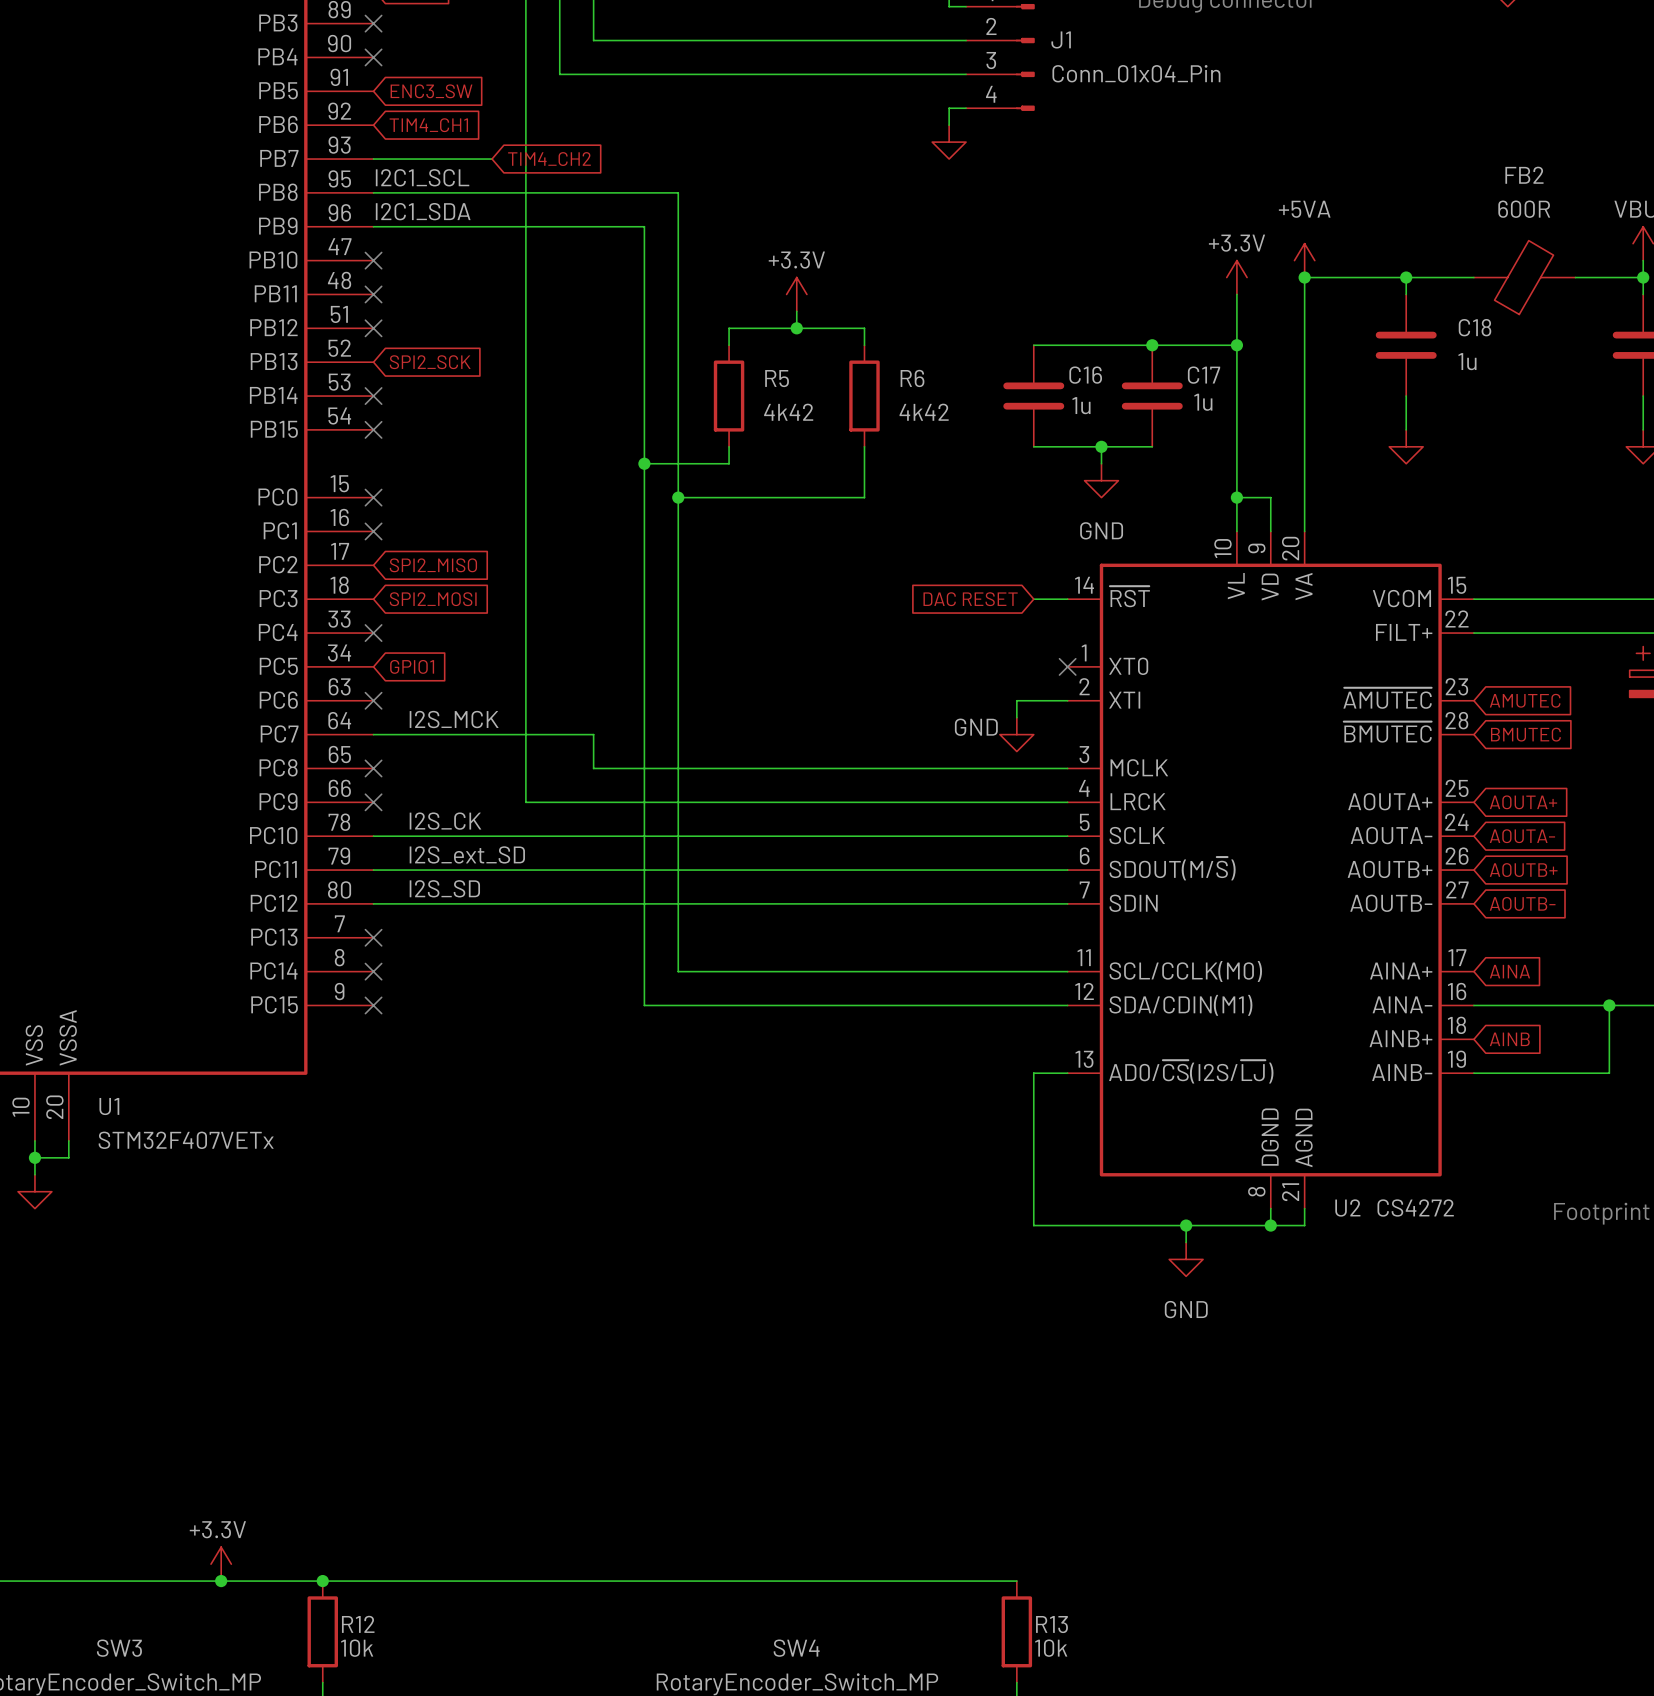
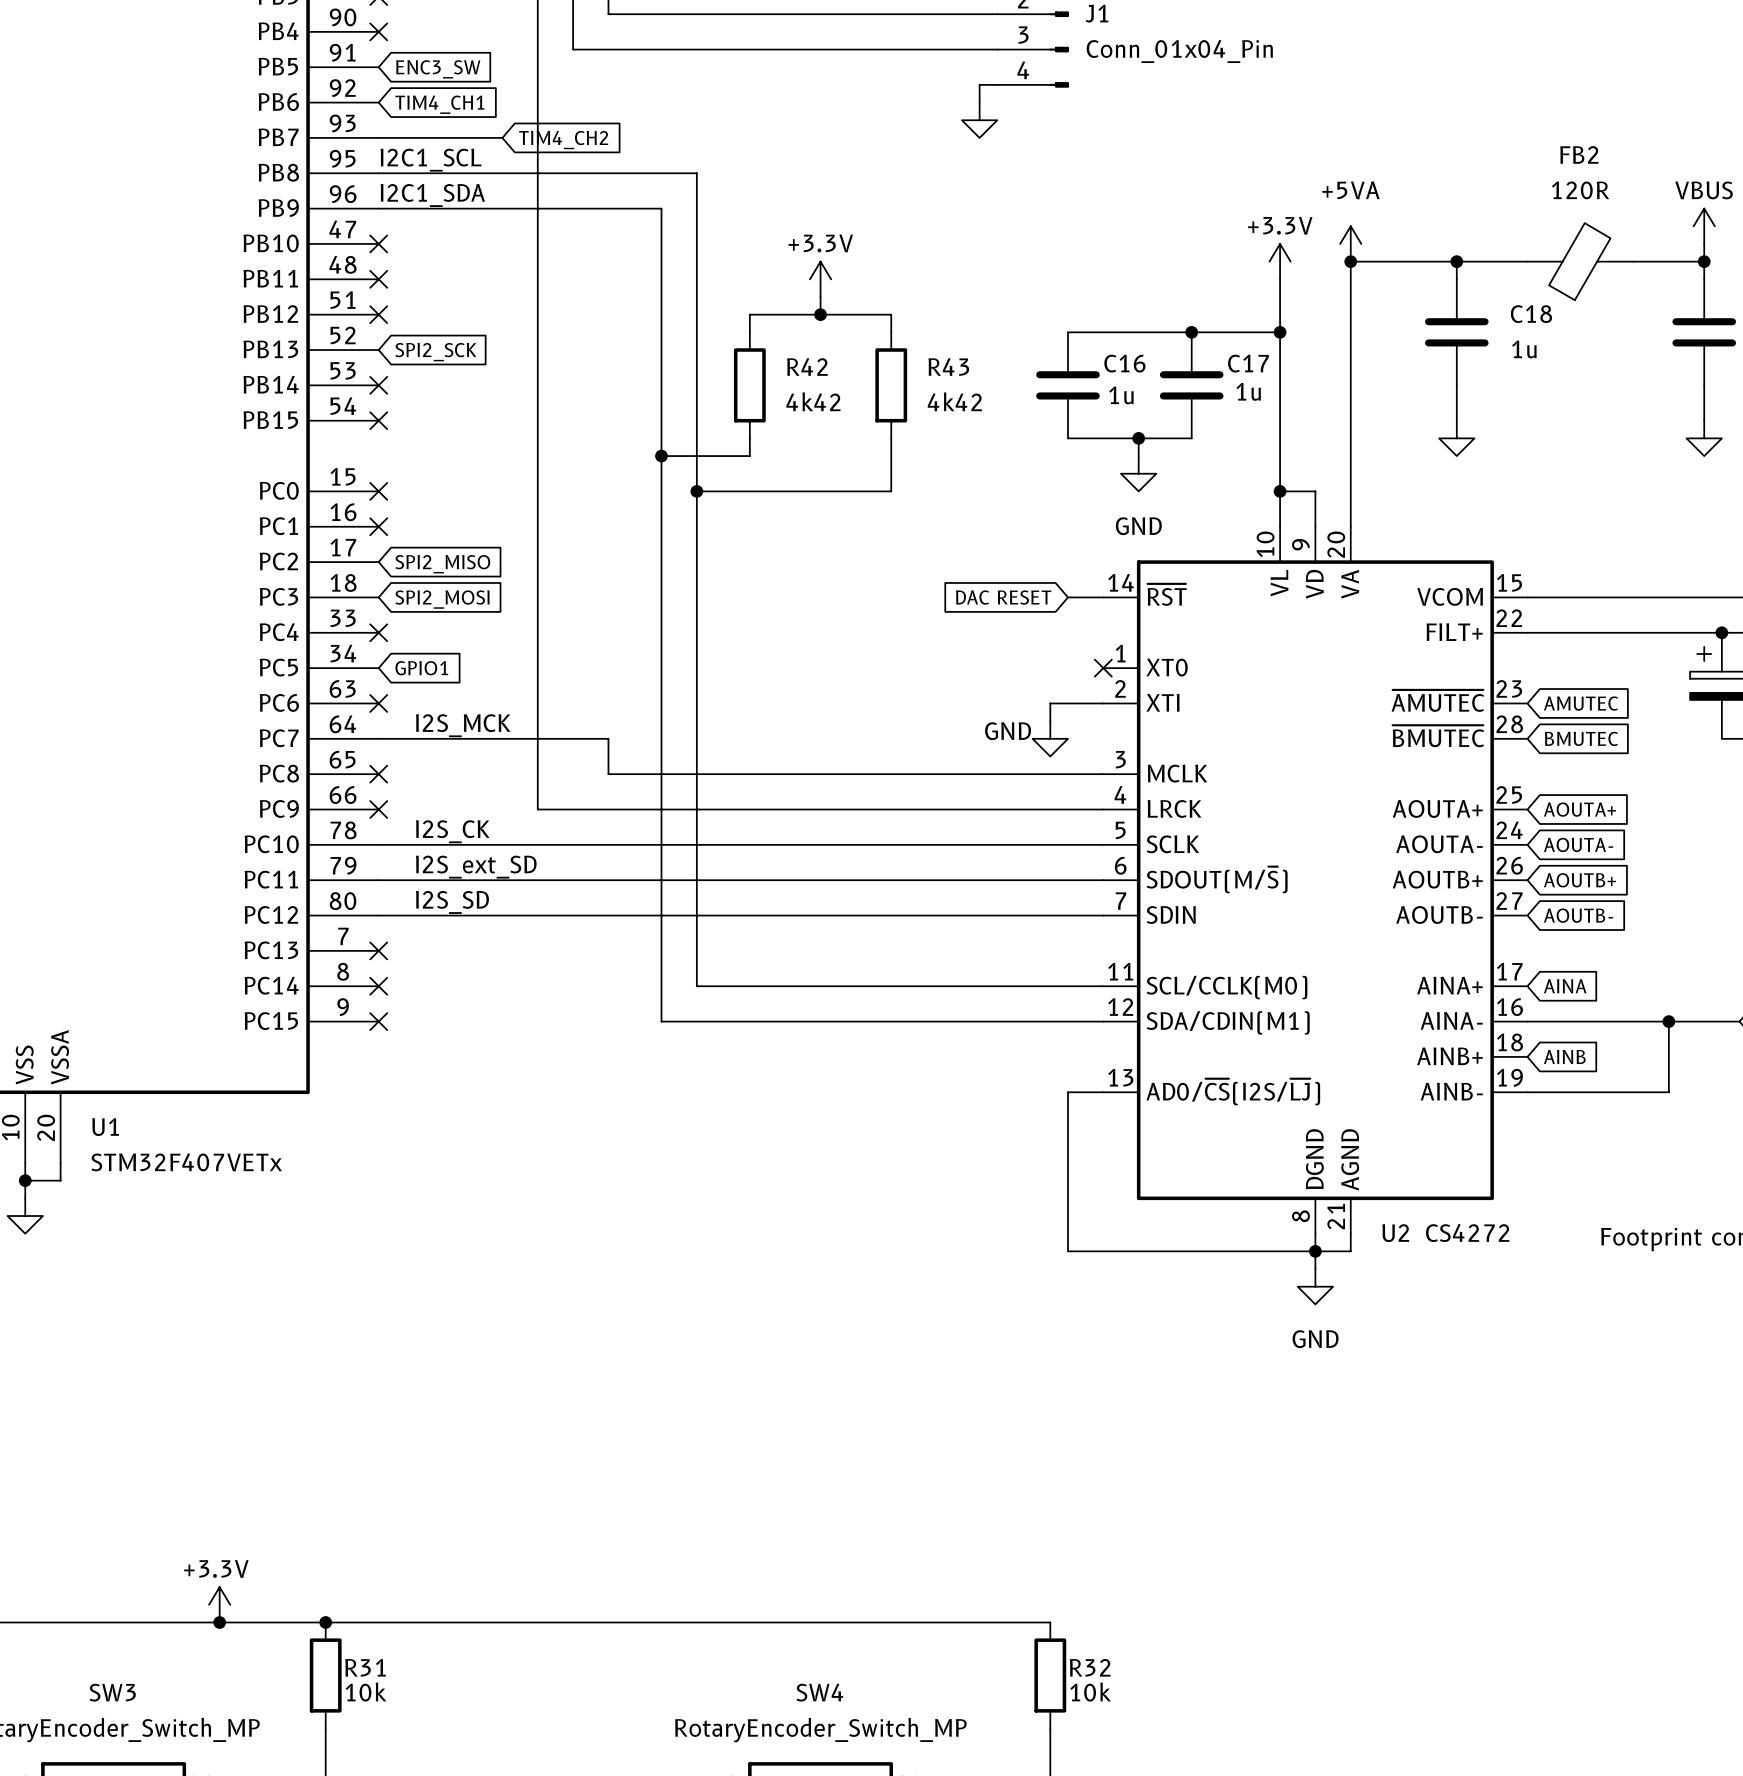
FB2 value: 600R (1524, 209) -> 120R (1580, 190)
R5 name: R5 (777, 378) -> R42 (807, 367)
R6 name: R6 (912, 378) -> R43 (948, 367)
wire: (1186, 1225) (1186, 1242) -> (1315, 1251) (1315, 1269)
junction: (1186, 1225) -> none
power symbol position: GND (1186, 1259) -> GND (1315, 1286)
R12 name: R12 (358, 1624) -> R31 (365, 1667)
R13 name: R13 (1051, 1624) -> R32 (1090, 1667)

